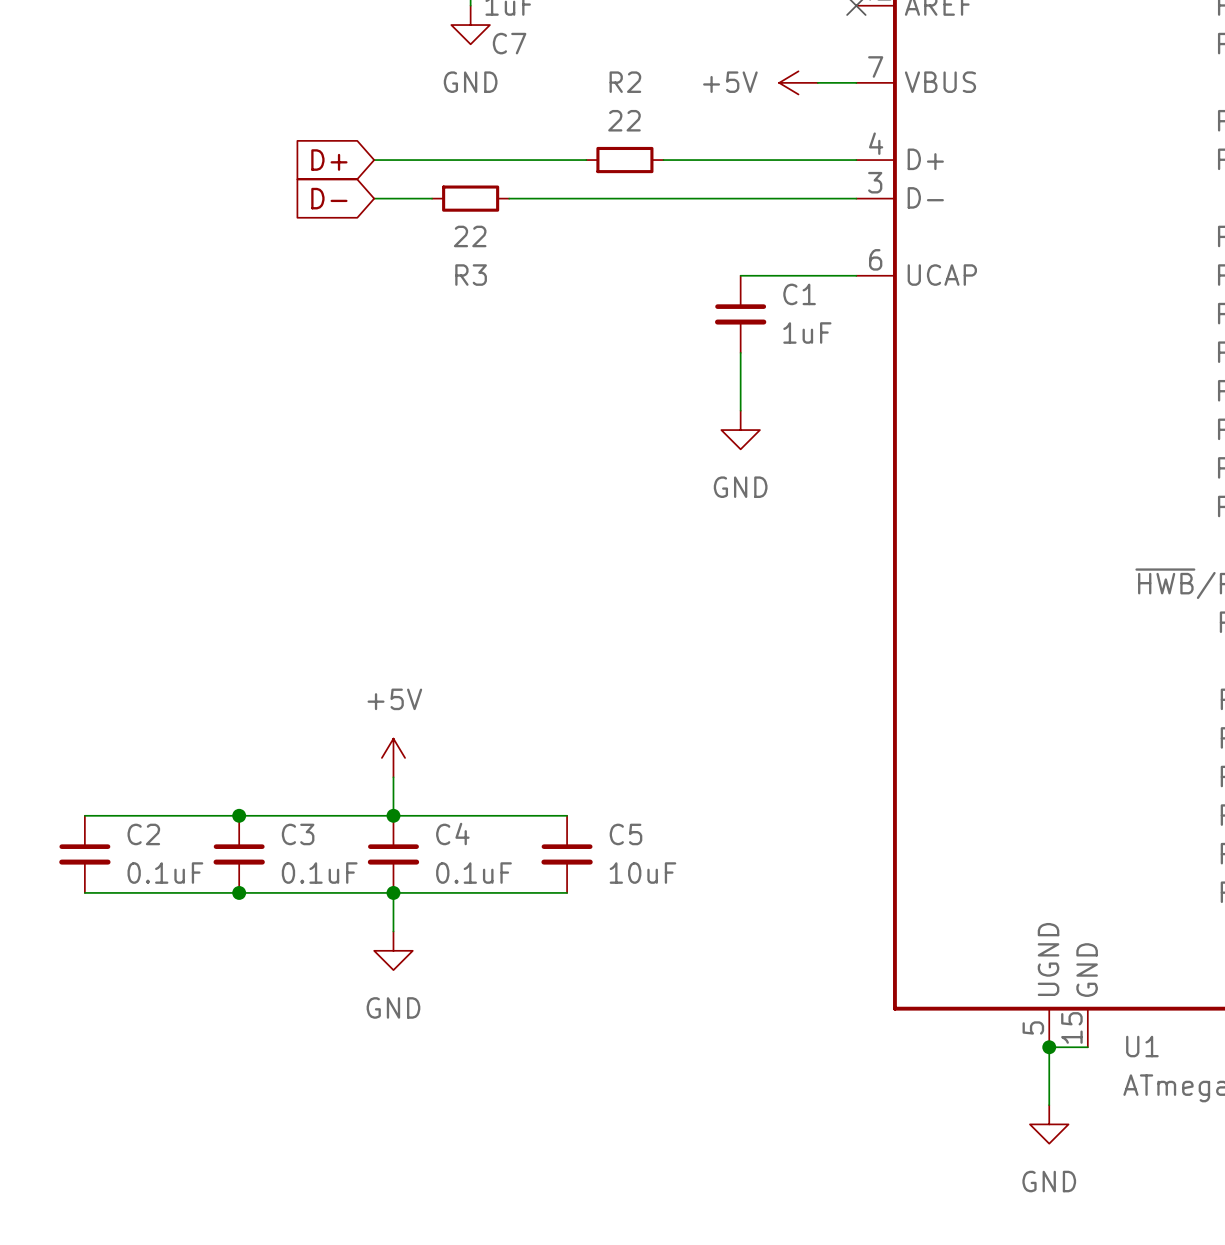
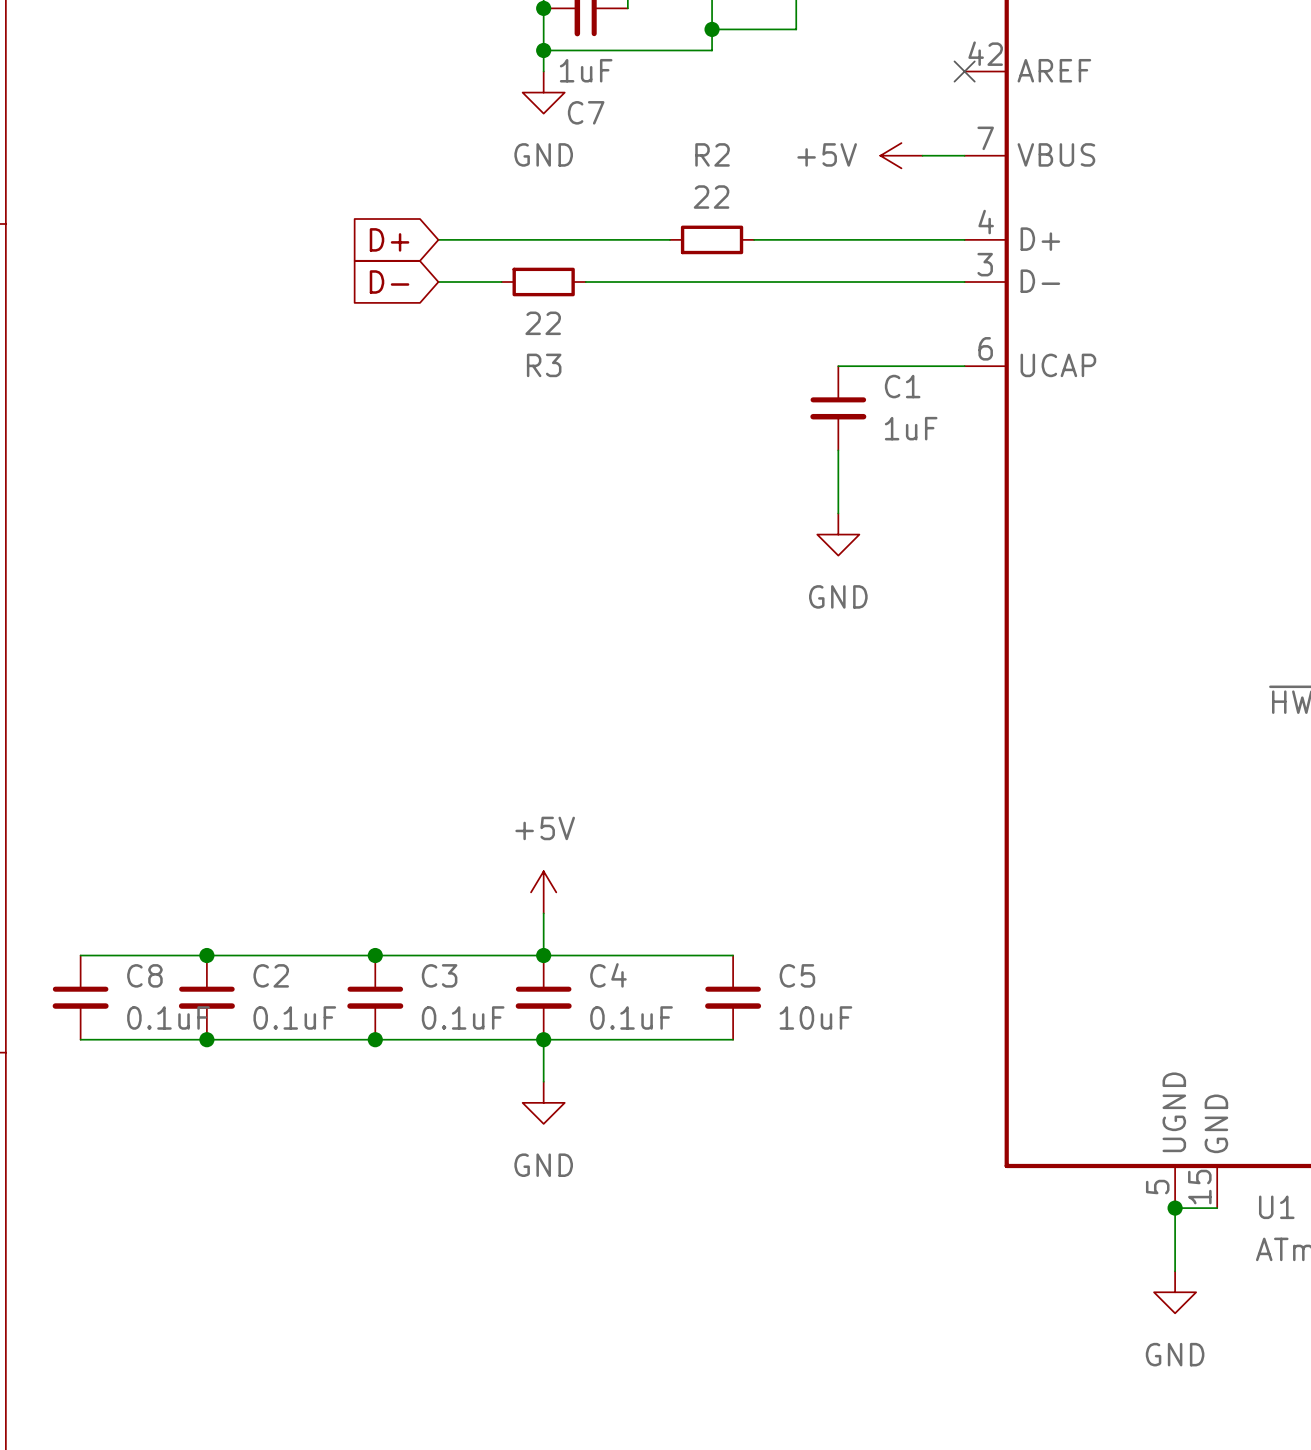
power symbol position: +5V (393, 757) -> +5V (543, 892)
wire: (393, 777) (393, 815) -> (543, 913) (543, 955)
wire: none -> (80, 955) (122, 955)
junction: none -> (206, 955)
junction: (239, 815) -> none
junction: none -> (375, 955)
junction: (393, 815) -> none
junction: none -> (543, 955)
wire: none -> (648, 955) (733, 955)
C8: none -> 0.1uF (80, 997)
C2 position: (84, 854) -> (206, 997)
C3 position: (239, 854) -> (375, 997)
C4 position: (393, 854) -> (543, 997)
C5 position: (567, 854) -> (733, 997)
wire: none -> (80, 1039) (122, 1039)
junction: none -> (206, 1039)
junction: (239, 892) -> none
junction: none -> (375, 1039)
wire: (393, 892) (393, 931) -> (543, 1039) (543, 1081)
junction: (393, 892) -> none
junction: none -> (543, 1039)
wire: none -> (648, 1039) (733, 1039)
power symbol position: GND (393, 950) -> GND (543, 1102)

